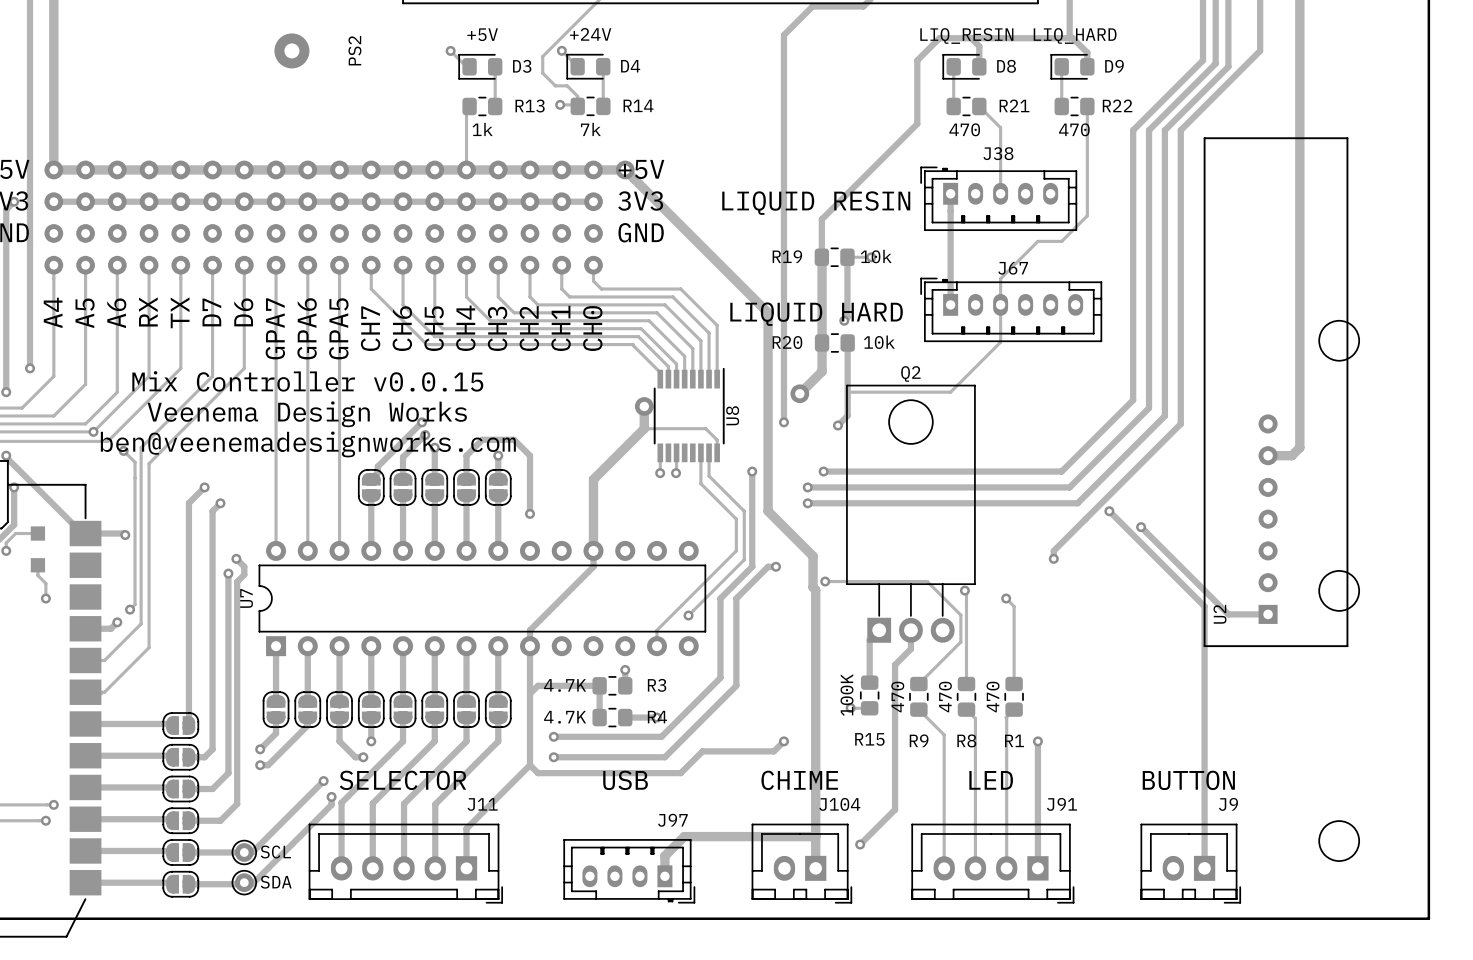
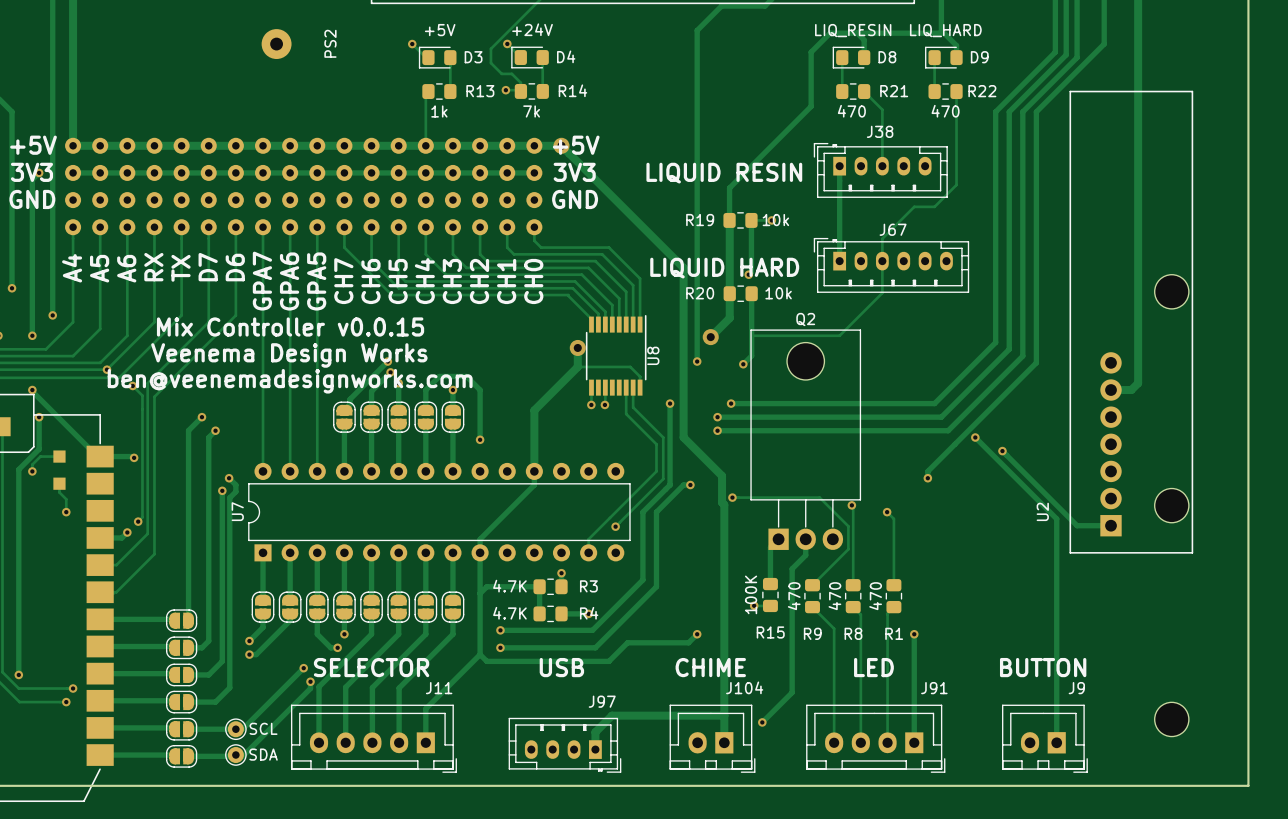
U2 footprint: [1203, 137, 1349, 648] -> [1069, 90, 1194, 554]
U2 name position: U2 (1219, 614) -> U2 (1042, 511)

